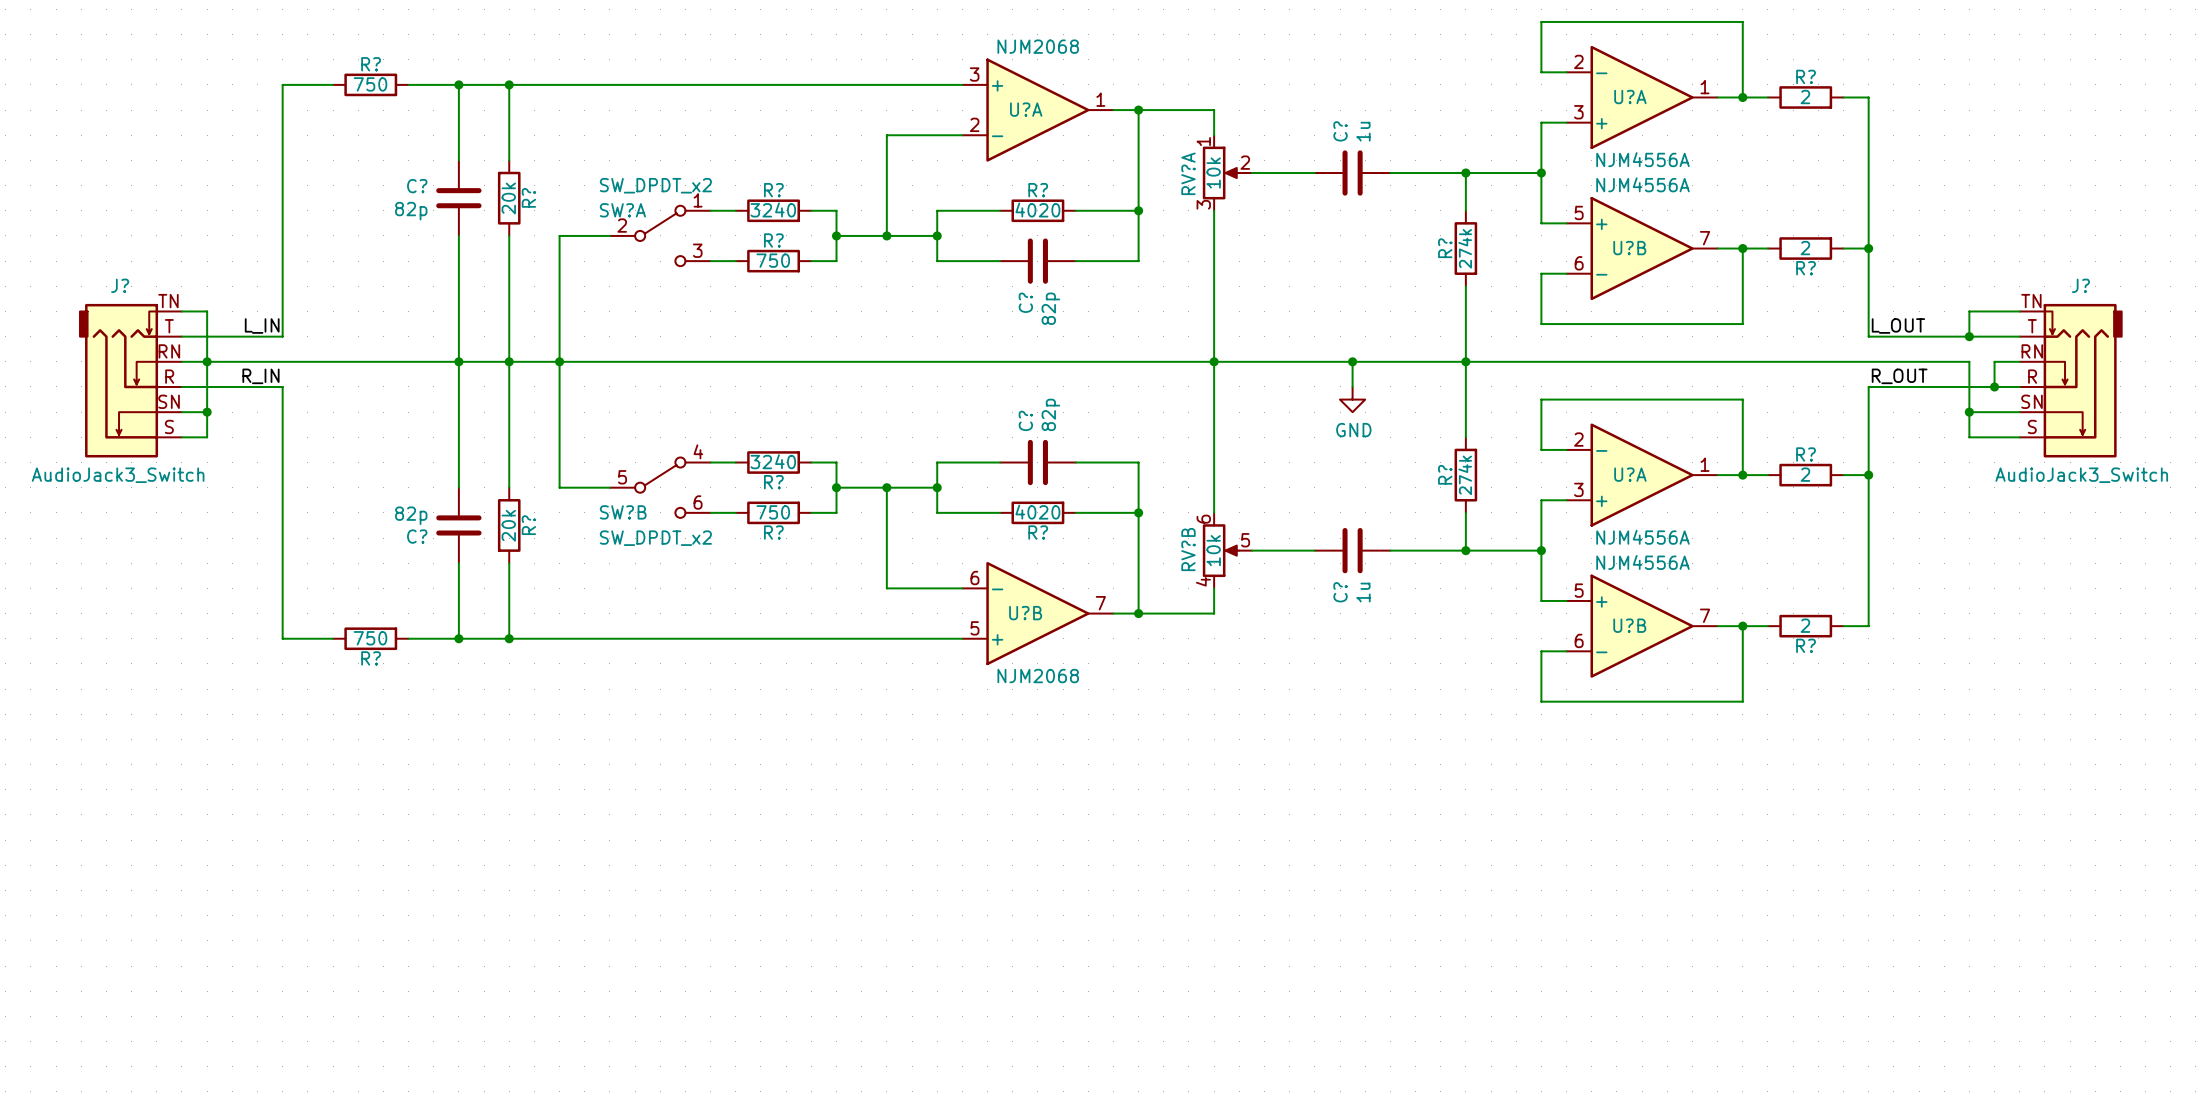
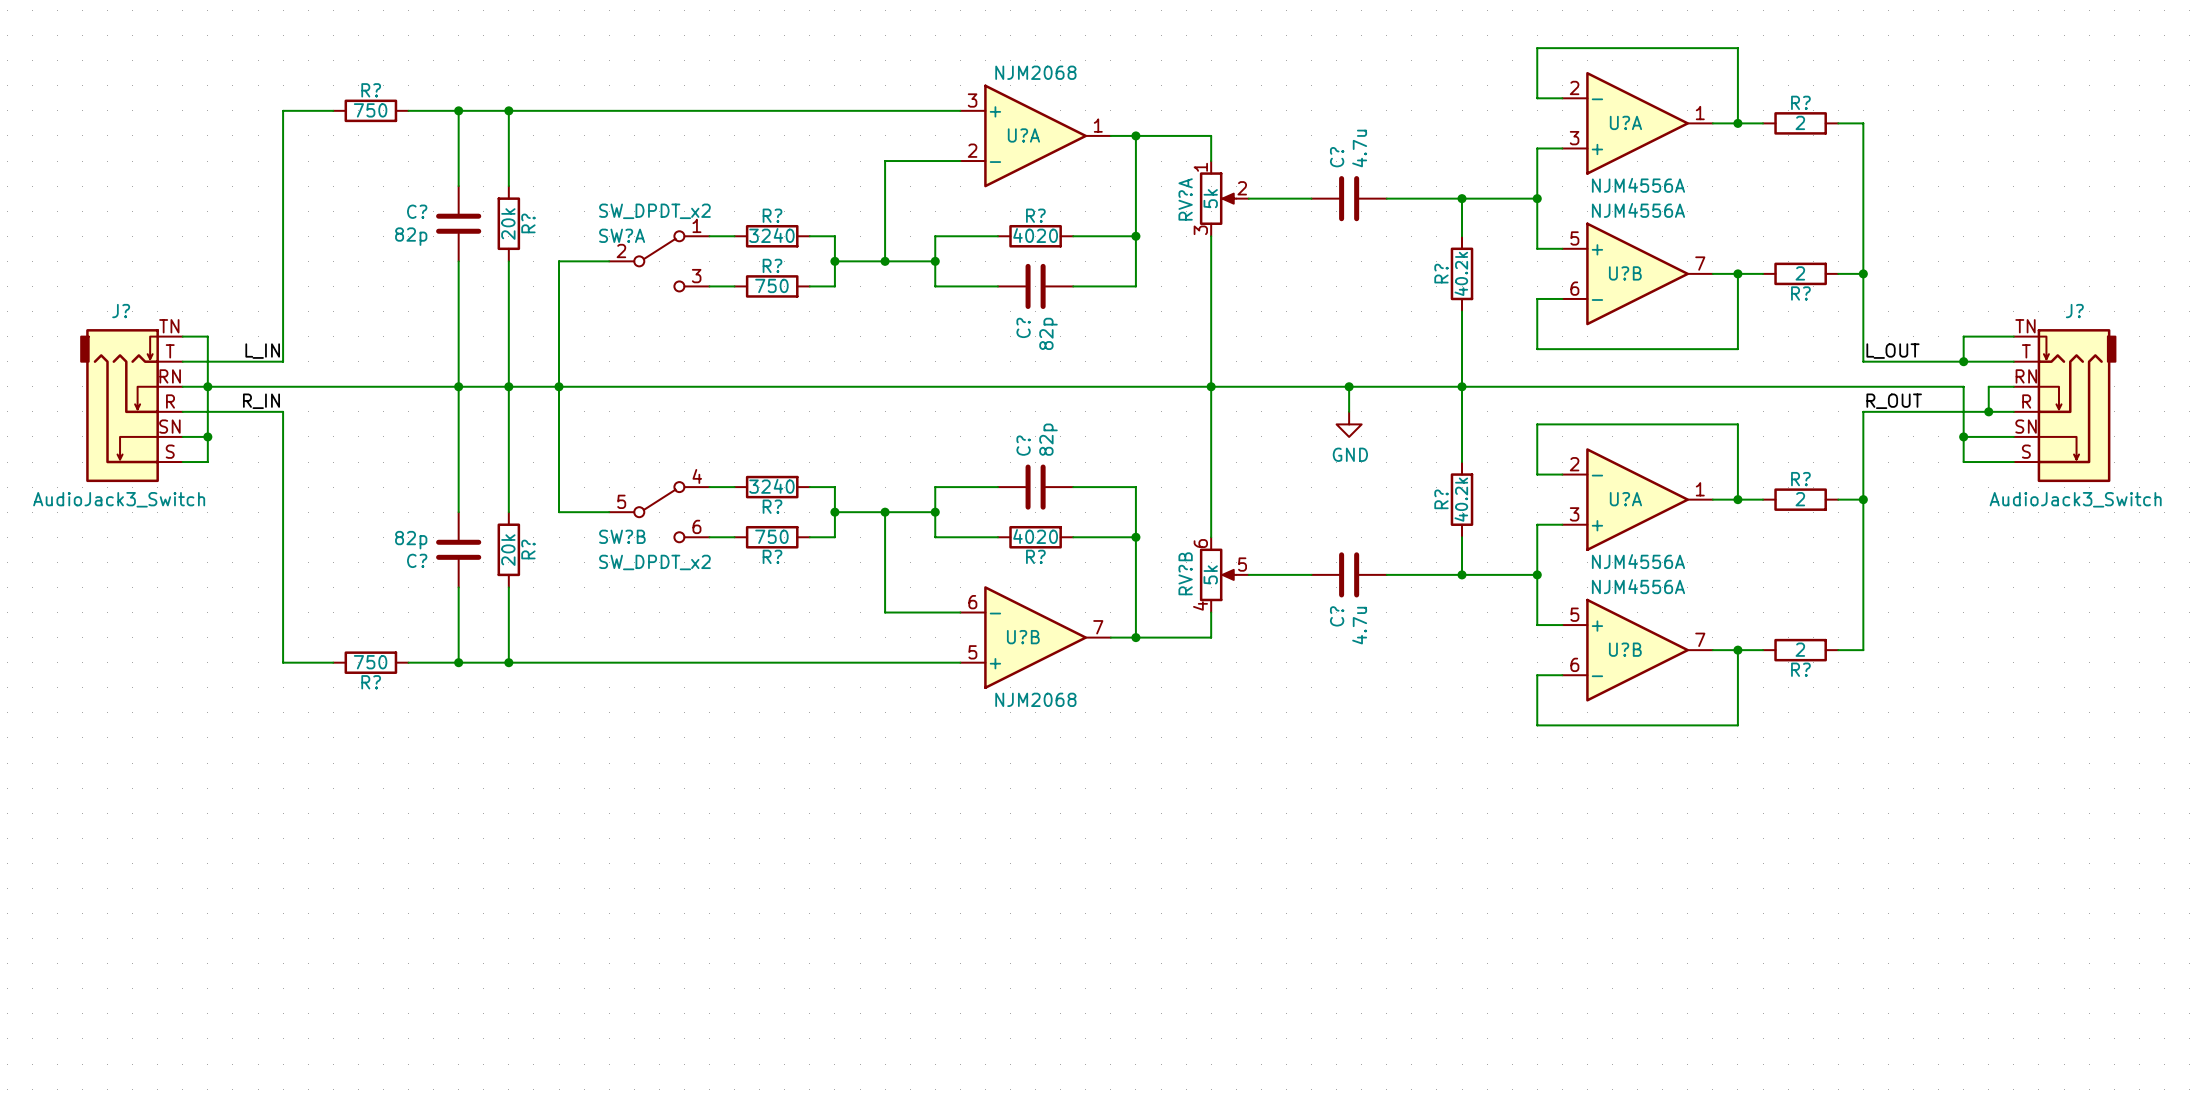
C? value: 1u (1363, 131) -> 4.7u (1359, 148)
RV?A value: 10k (1213, 173) -> 5k (1210, 198)
R? value: 274k (1465, 248) -> 40.2k (1461, 273)
R? value: 274k (1465, 475) -> 40.2k (1461, 499)
RV?B value: 10k (1213, 550) -> 5k (1210, 574)
C? value: 1u (1363, 592) -> 4.7u (1359, 625)

